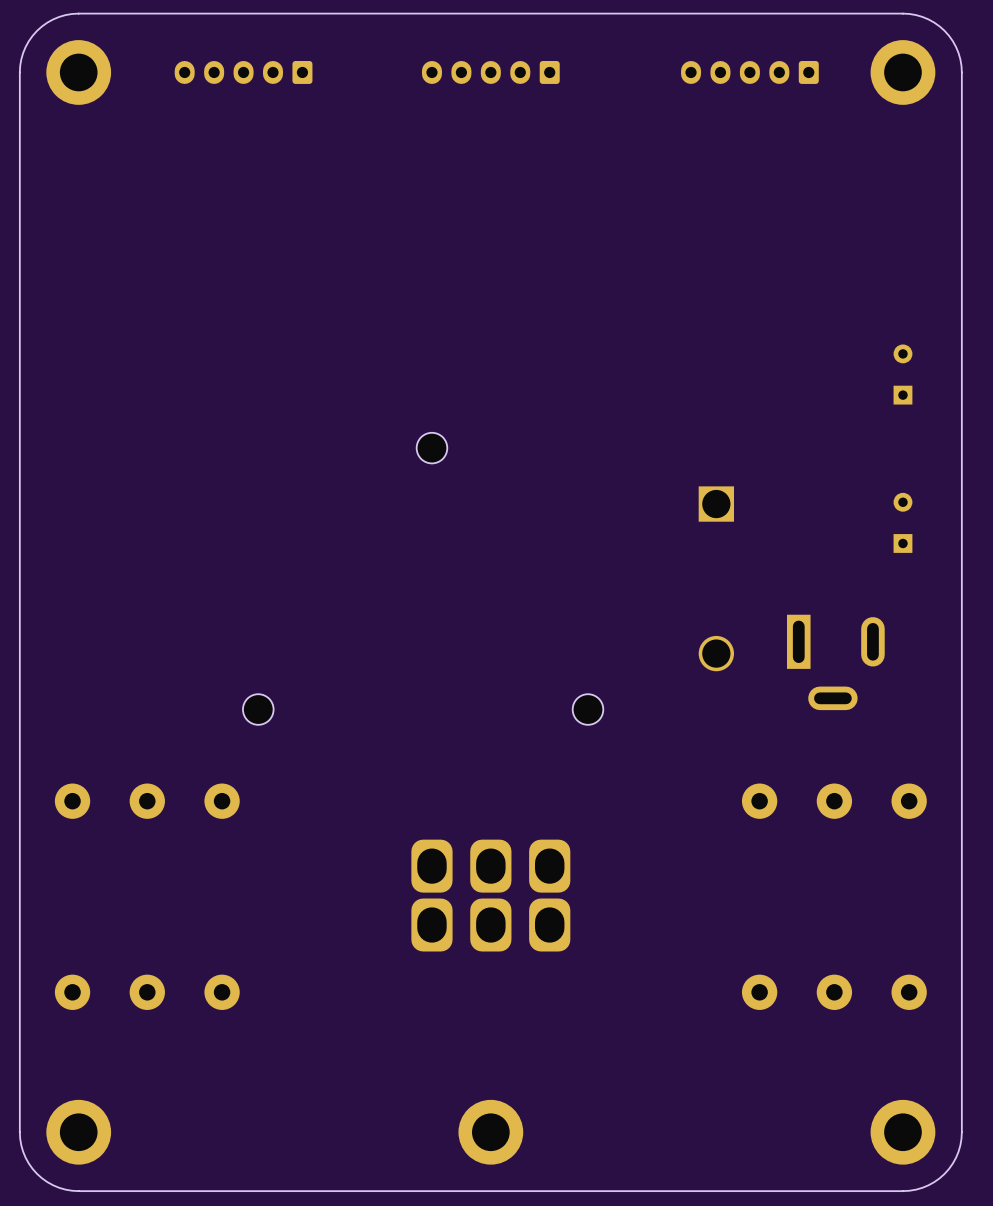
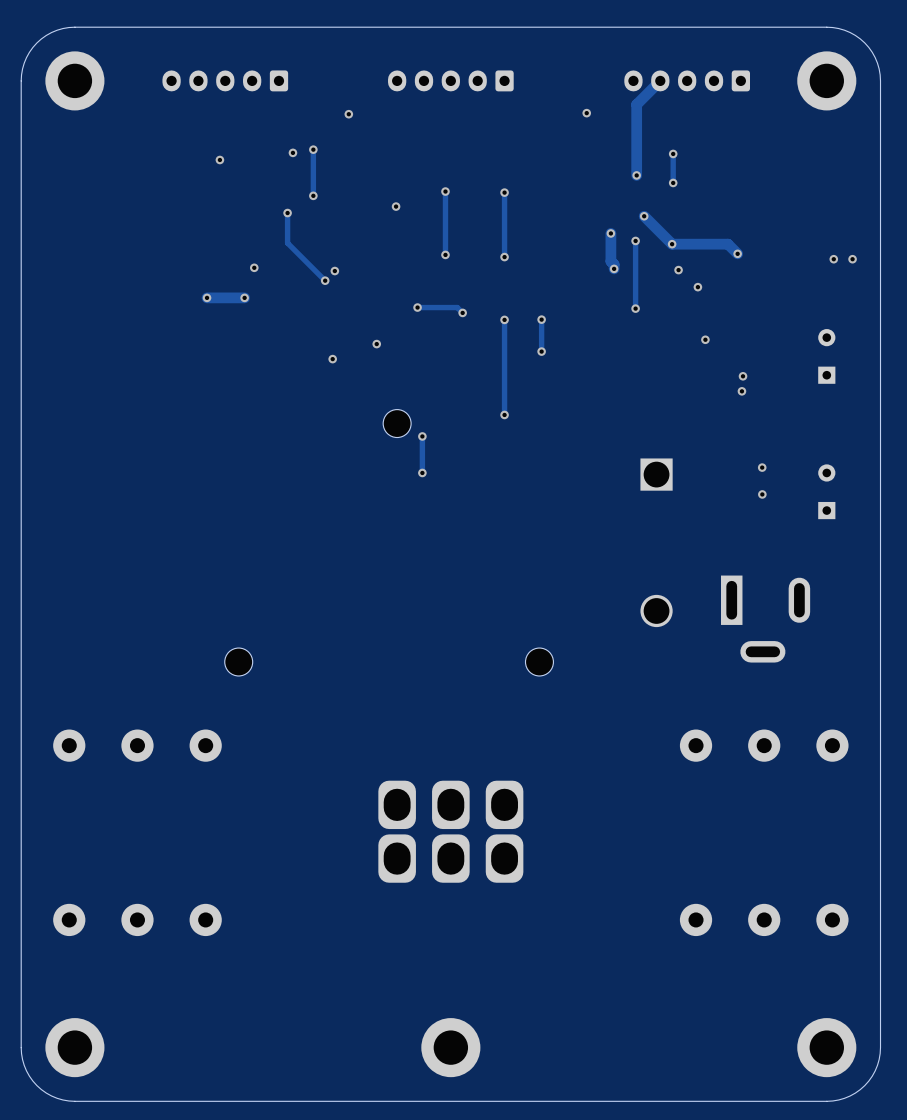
track: none -> (660, 80) (636, 104) (636, 175)
via: none -> (586, 113)
via: none -> (348, 114)
track: none -> (313, 149) (313, 195)
via: none -> (313, 149)
via: none -> (292, 152)
track: none -> (673, 153) (673, 182)
via: none -> (673, 153)
via: none -> (219, 159)
via: none -> (636, 175)
via: none -> (673, 182)
track: none -> (445, 191) (445, 254)
via: none -> (445, 191)
track: none -> (504, 192) (504, 257)
via: none -> (504, 192)
via: none -> (313, 195)
via: none -> (396, 206)
track: none -> (287, 213) (287, 243) (325, 280)
via: none -> (287, 213)
track: none -> (644, 216) (672, 244) (727, 244) (737, 253)
via: none -> (644, 216)
track: none -> (610, 233) (610, 261) (614, 264) (614, 268)
via: none -> (610, 233)
track: none -> (635, 240) (635, 308)
via: none -> (635, 240)
via: none -> (672, 244)
via: none -> (737, 253)
via: none -> (445, 254)
via: none -> (504, 257)
via: none -> (833, 259)
via: none -> (852, 259)
via: none -> (254, 267)
via: none -> (614, 268)
via: none -> (678, 270)
via: none -> (334, 271)
via: none -> (325, 280)
via: none -> (697, 287)
via: none -> (207, 297)
track: none -> (244, 297) (207, 297)
via: none -> (244, 297)
track: none -> (417, 307) (457, 307) (462, 312)
via: none -> (417, 307)
via: none -> (635, 308)
via: none -> (462, 312)
track: none -> (504, 319) (504, 414)
via: none -> (504, 319)
track: none -> (541, 319) (541, 351)
via: none -> (541, 319)
via: none -> (705, 339)
via: none -> (376, 344)
via: none -> (541, 351)
via: none -> (332, 359)
via: none -> (743, 376)
via: none -> (741, 391)
via: none -> (504, 414)
track: none -> (422, 436) (422, 472)
via: none -> (422, 436)
via: none -> (762, 467)
via: none -> (422, 472)
via: none -> (762, 494)

